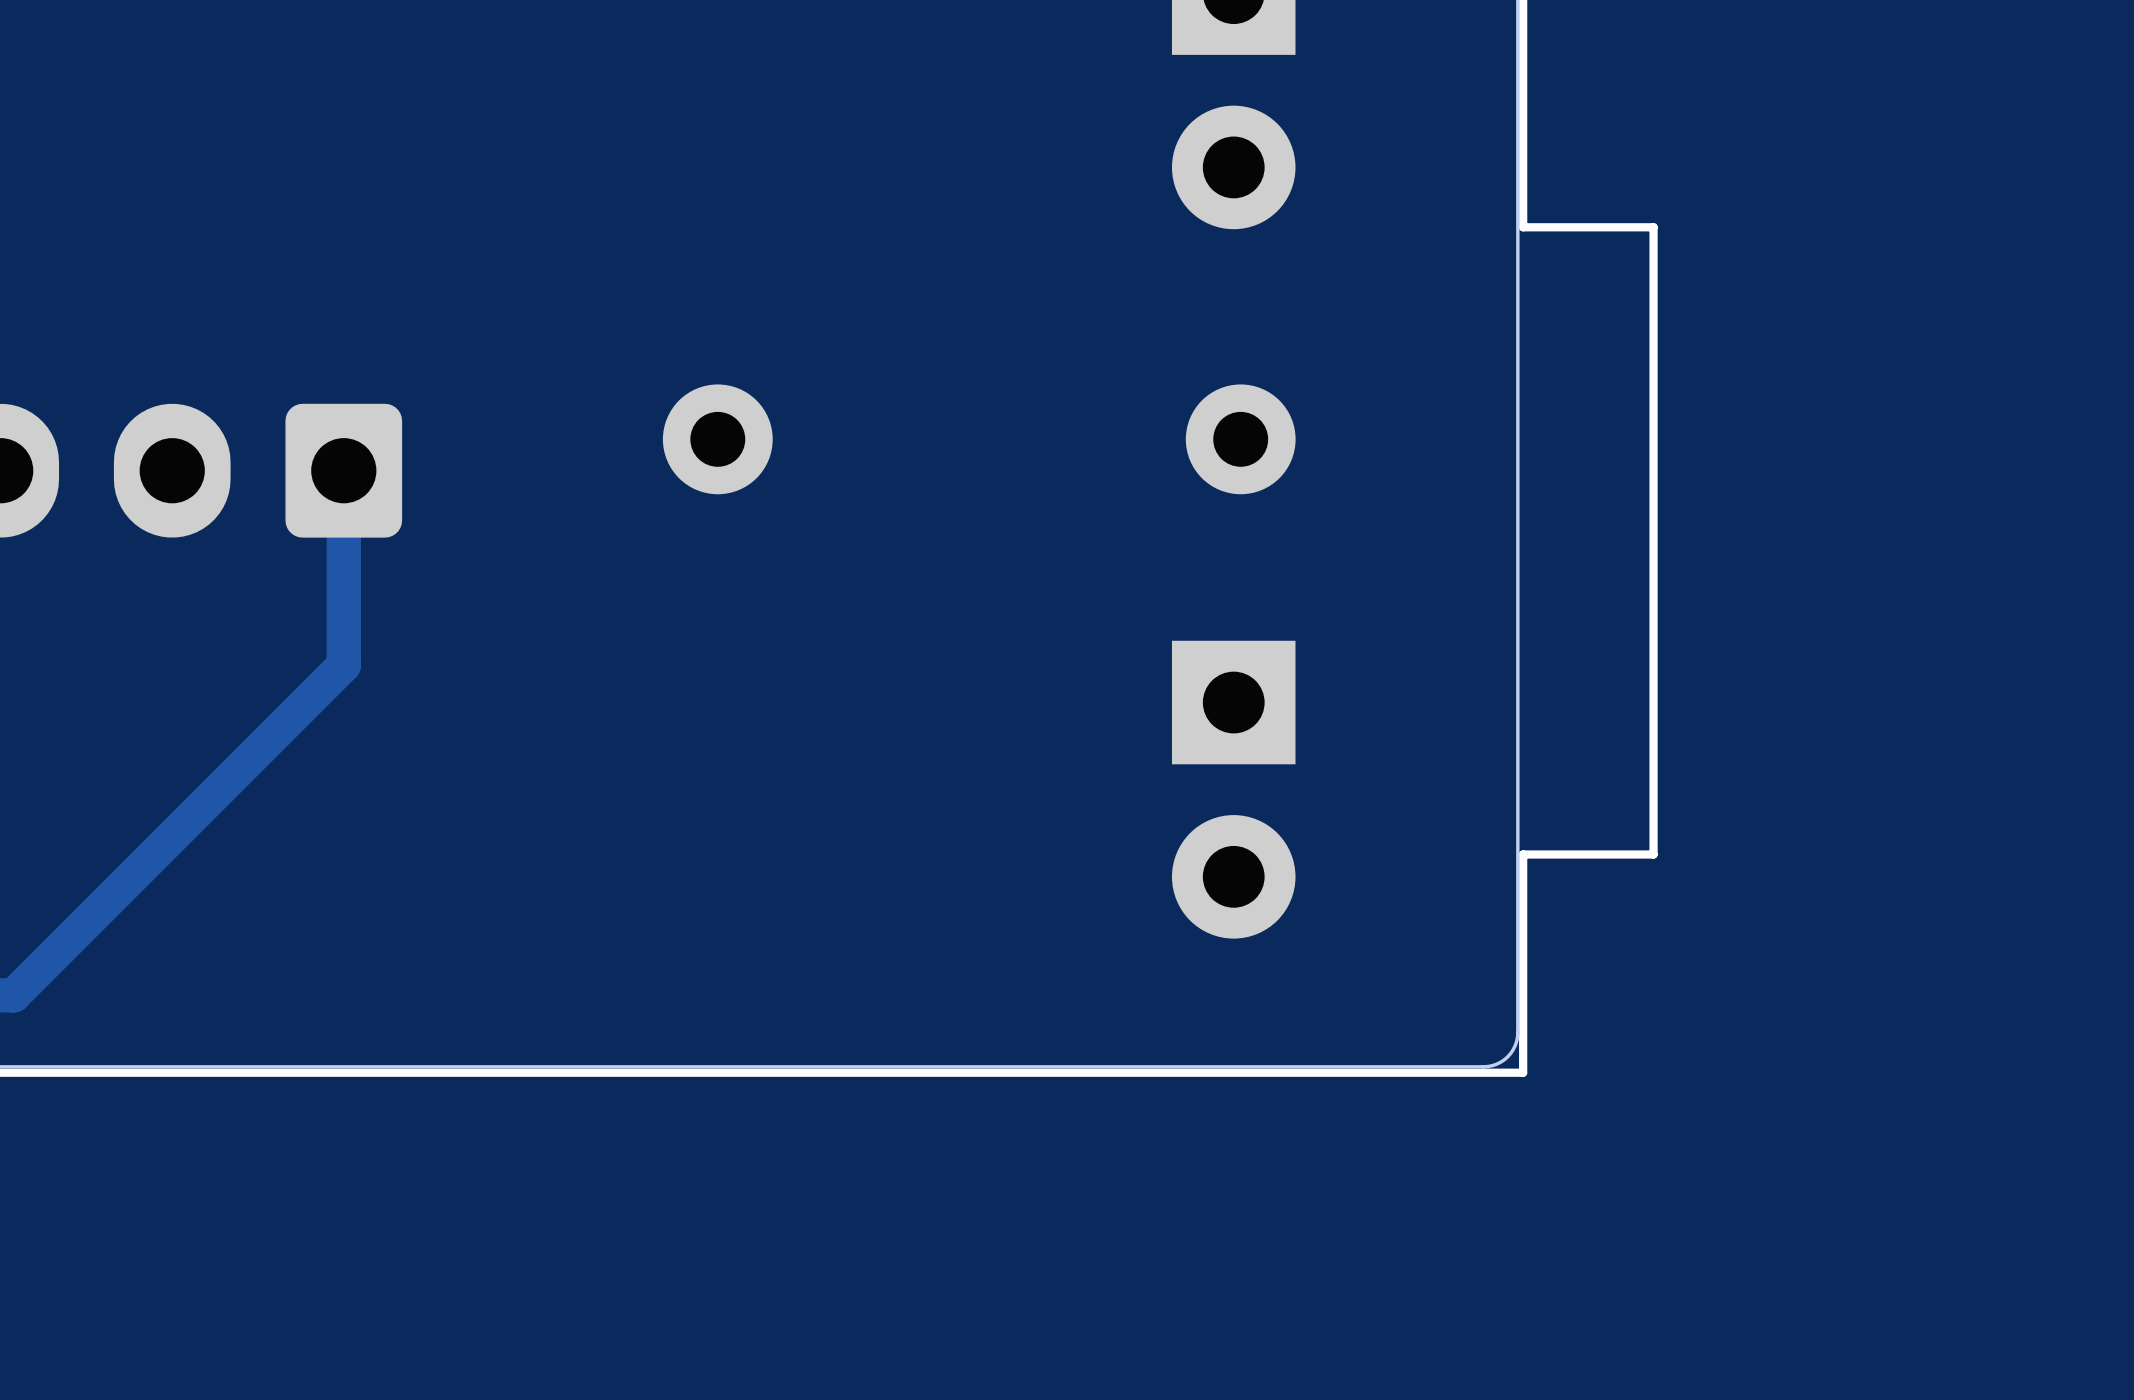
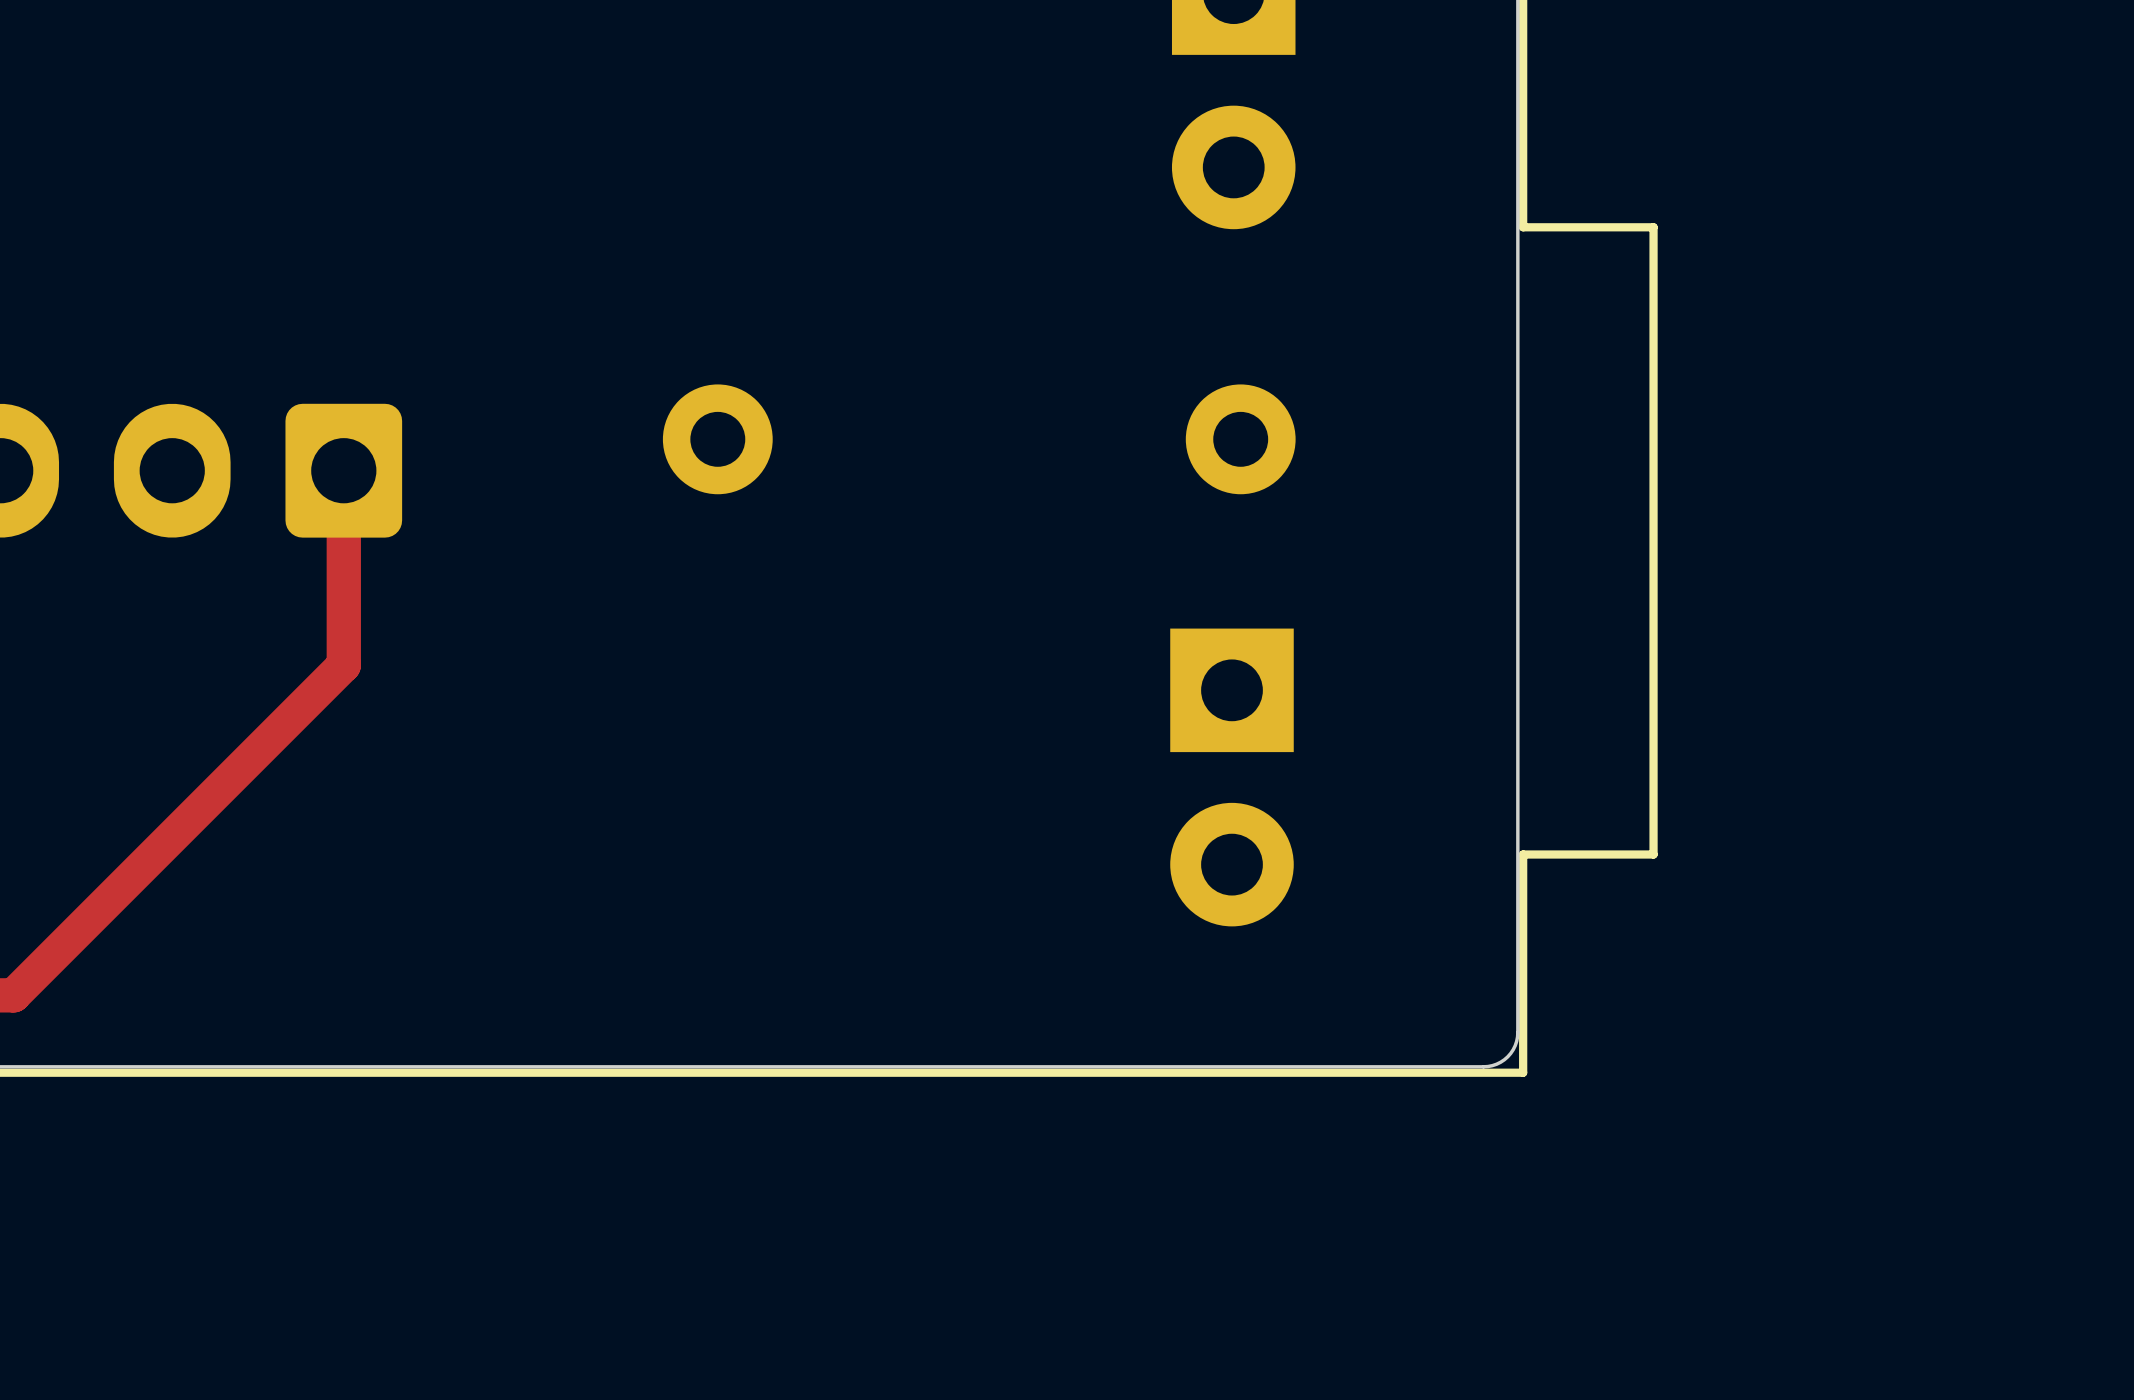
part position: (1233, 789) -> (1231, 777)

